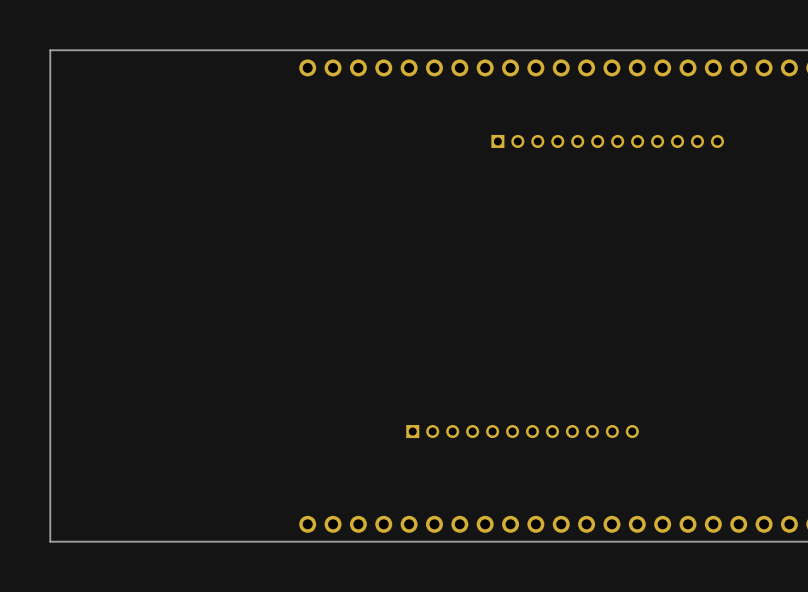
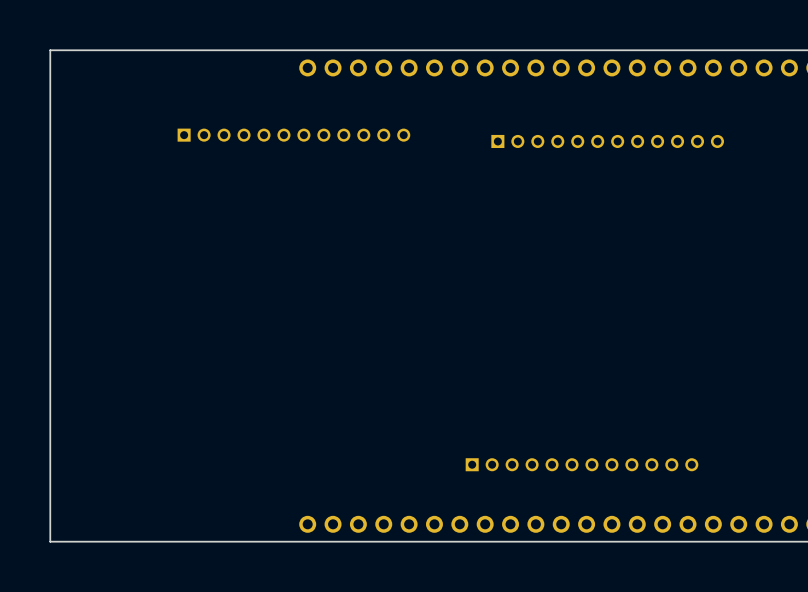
part: none -> (293, 135)
part position: (522, 431) -> (582, 464)

